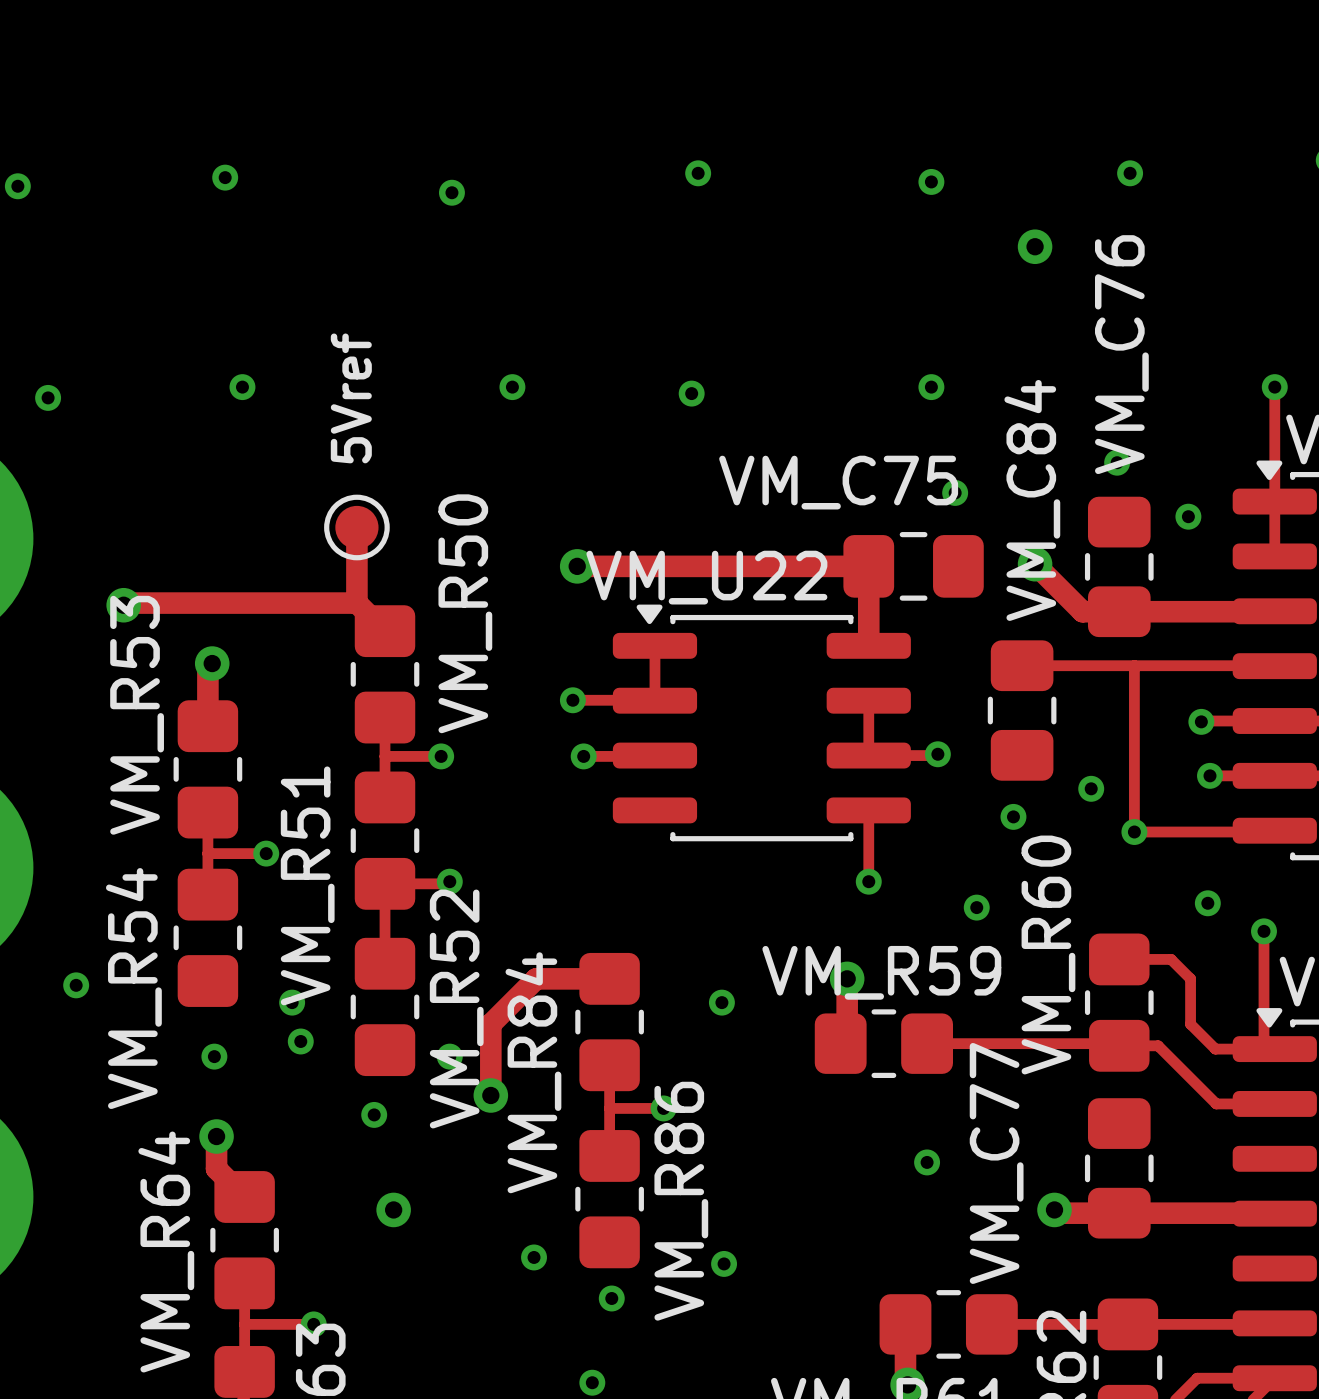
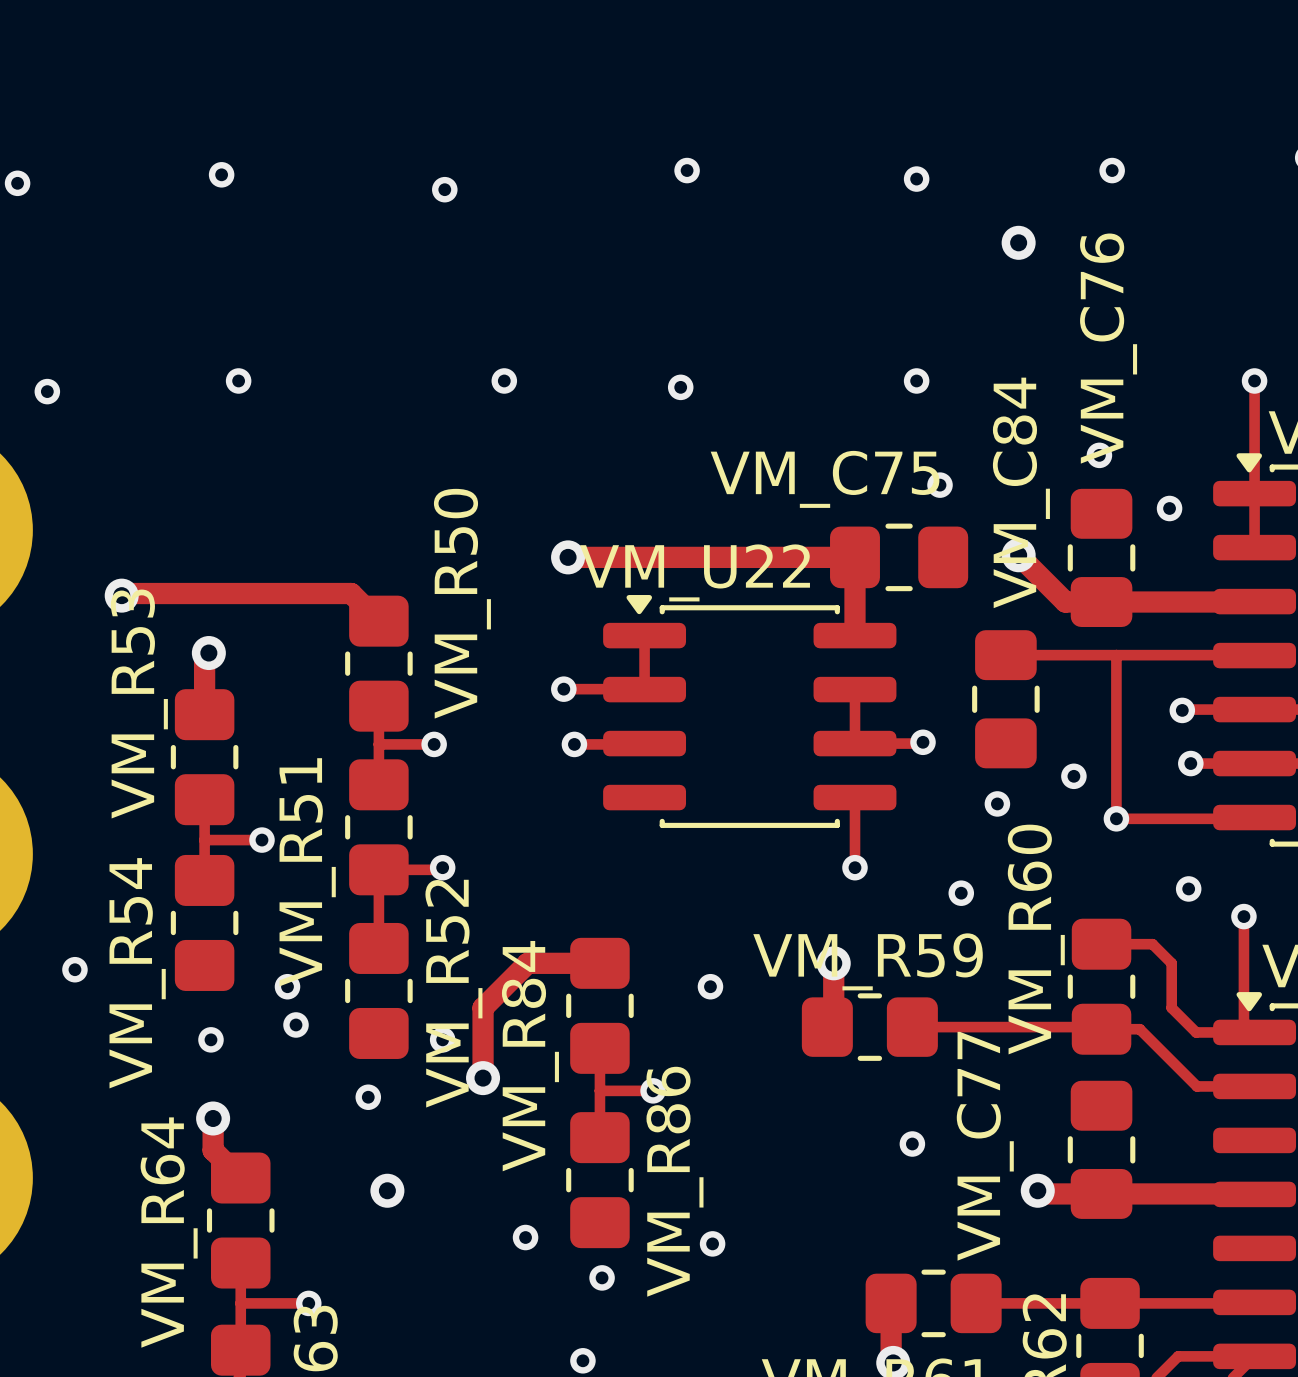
track: (356, 527) (356, 603) -> none
part: 5Vref (356, 527) -> none

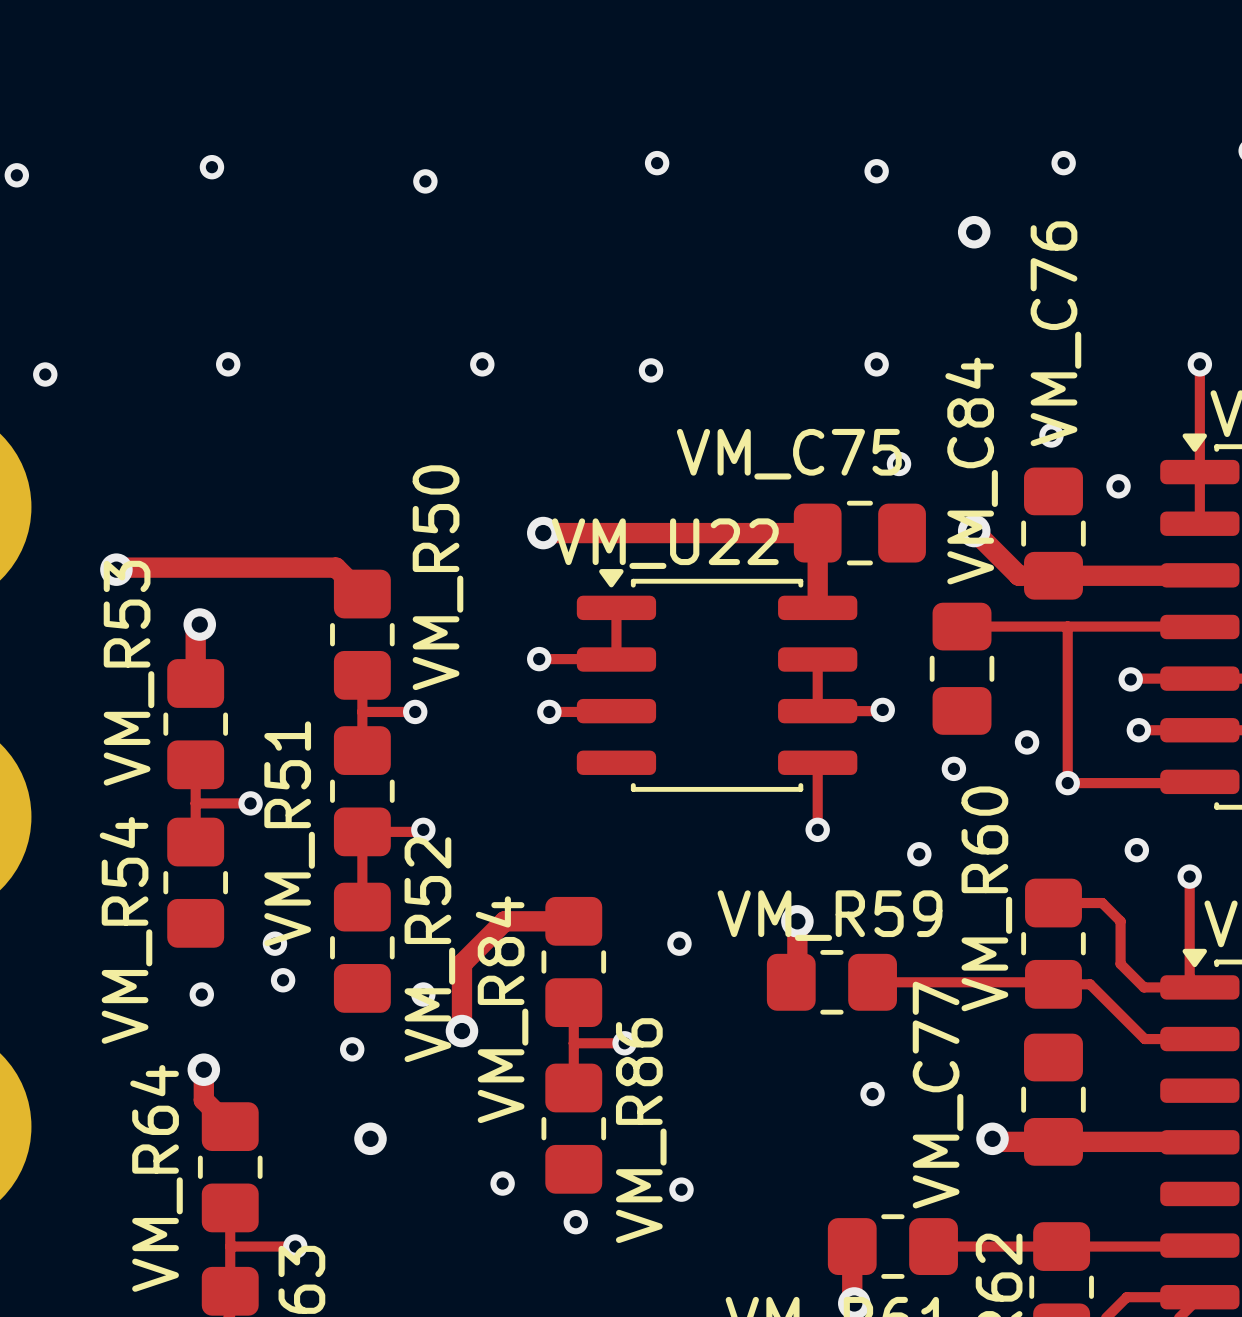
via: (74, 969) -> none
via: (582, 1360) -> none

